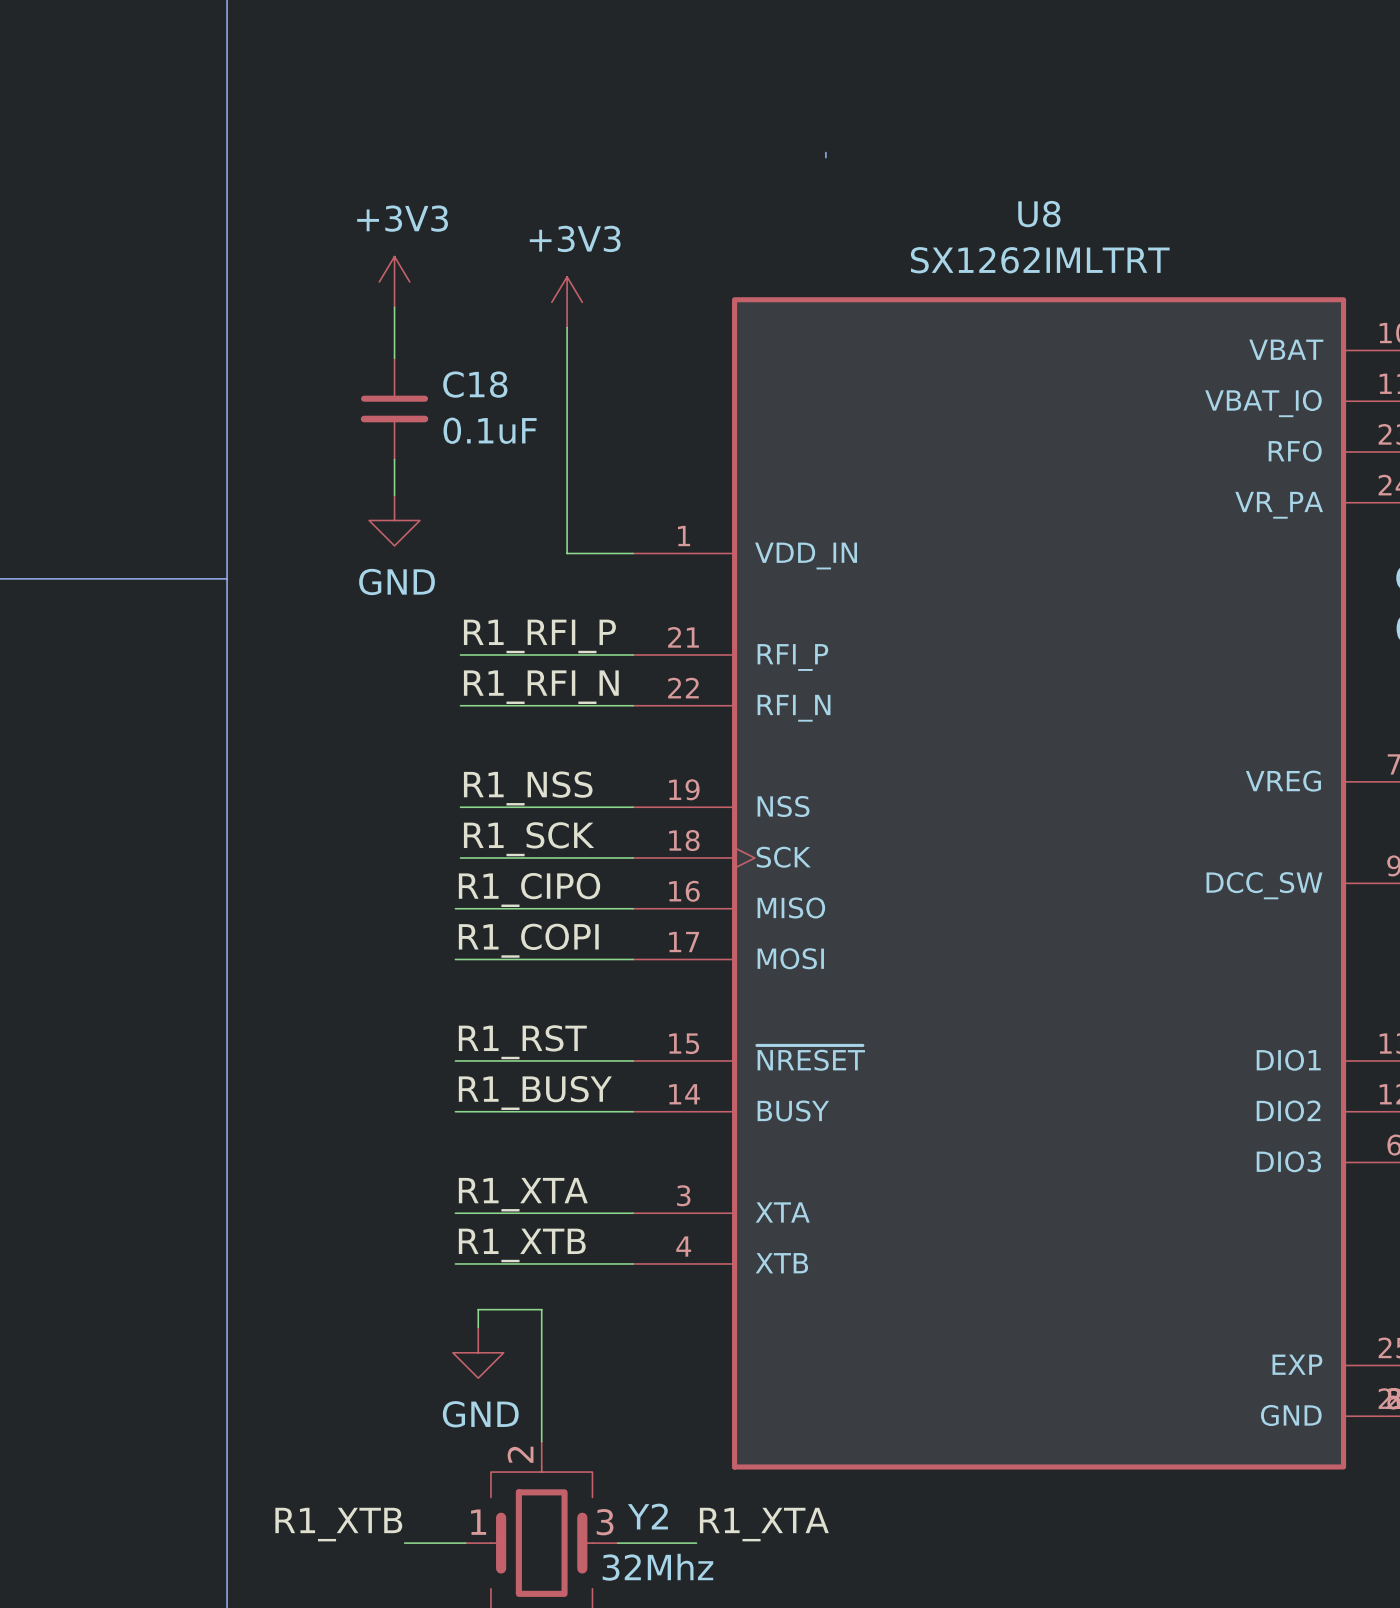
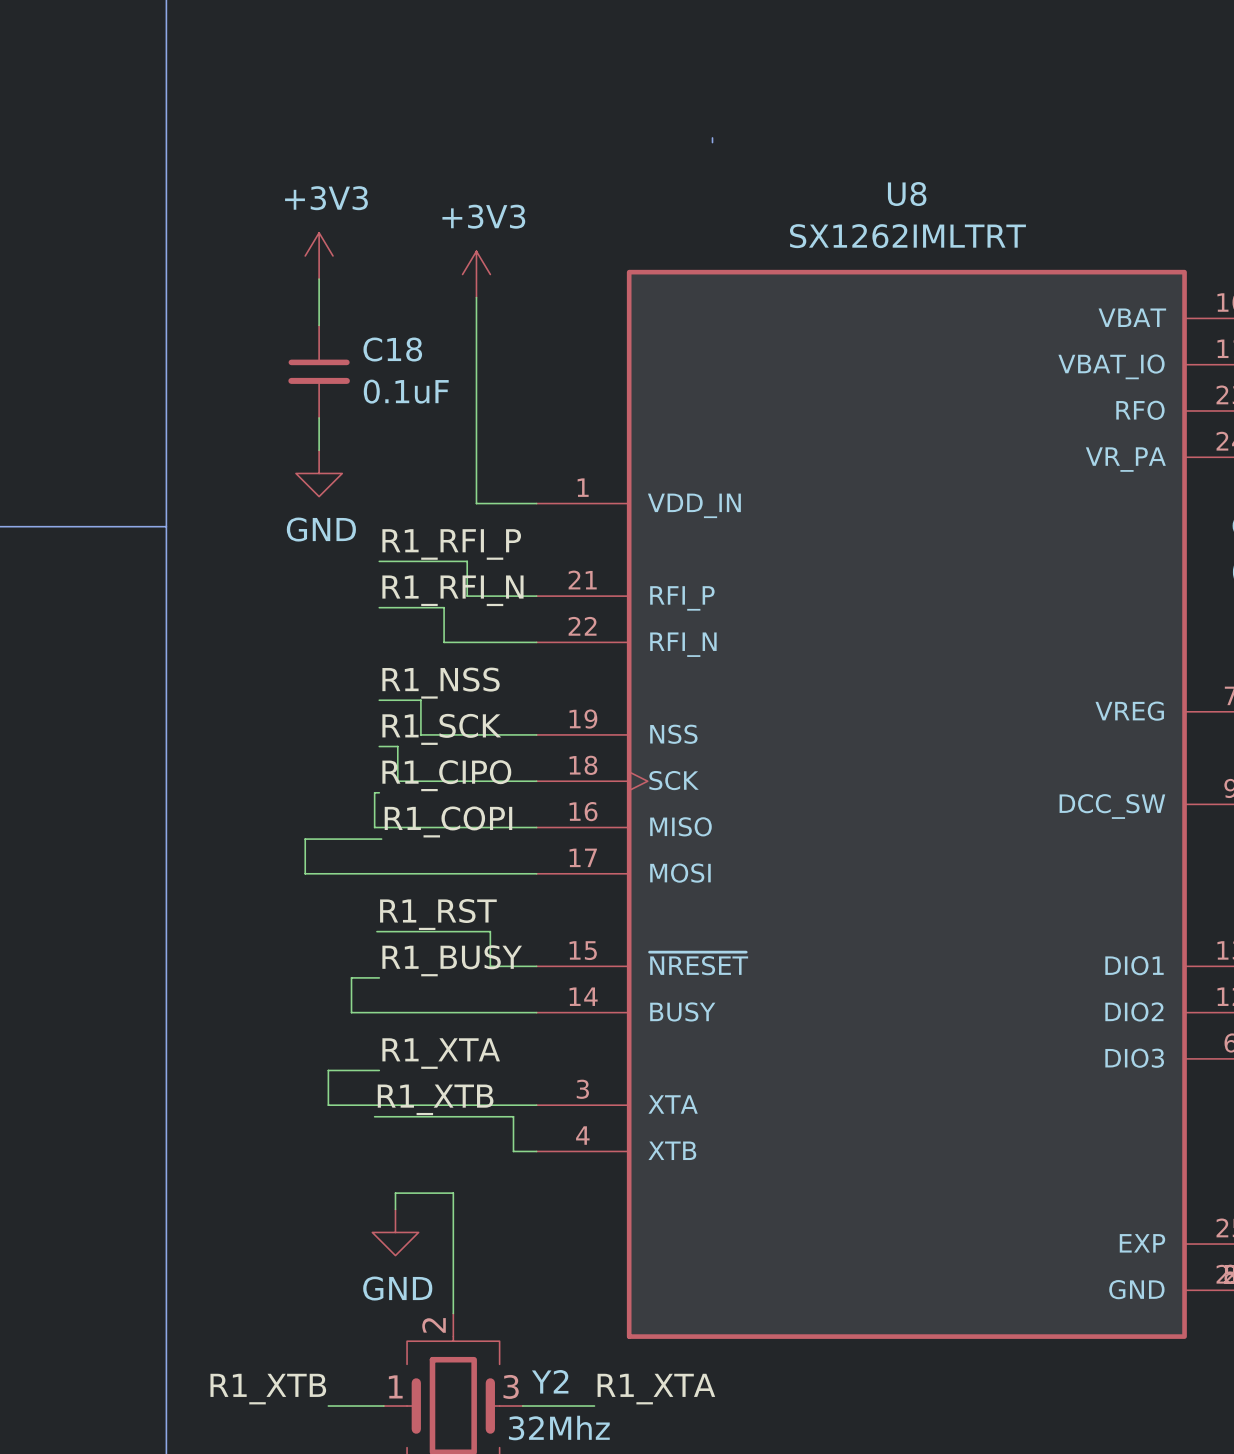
label position: R1_RFI_P (539, 636) -> R1_RFI_P (451, 544)
wire: (460, 654) (556, 654) -> (379, 561) (467, 561) (467, 596)
label position: R1_RFI_N (541, 687) -> R1_RFI_N (452, 590)
wire: (460, 705) (531, 705) -> (379, 607) (444, 607) (444, 642)
label position: R1_NSS (528, 788) -> R1_NSS (441, 683)
wire: (460, 807) (506, 807) -> (379, 700) (420, 700) (420, 734)
label position: R1_SCK (529, 839) -> R1_SCK (441, 729)
wire: (460, 857) (480, 857) -> (379, 746) (397, 746) (397, 781)
wire: none -> (379, 792) (374, 792) (374, 827)
label position: R1_CIPO (529, 889) -> R1_CIPO (446, 775)
wire: none -> (381, 839) (305, 839) (305, 873) (374, 873)
label position: R1_COPI (528, 940) -> R1_COPI (448, 821)
label position: R1_RST (522, 1042) -> R1_RST (438, 914)
wire: (455, 1060) (582, 1060) -> (376, 931) (490, 931) (490, 966)
wire: none -> (379, 977) (351, 977) (351, 1012) (374, 1012)
label position: R1_BUSY (535, 1092) -> R1_BUSY (452, 960)
wire: none -> (379, 1070) (328, 1070) (328, 1105) (374, 1105)
label position: R1_XTA (523, 1194) -> R1_XTA (441, 1053)
label position: R1_XTB (522, 1245) -> R1_XTB (435, 1099)
wire: (455, 1263) (607, 1263) -> (374, 1116) (513, 1116) (513, 1151)

